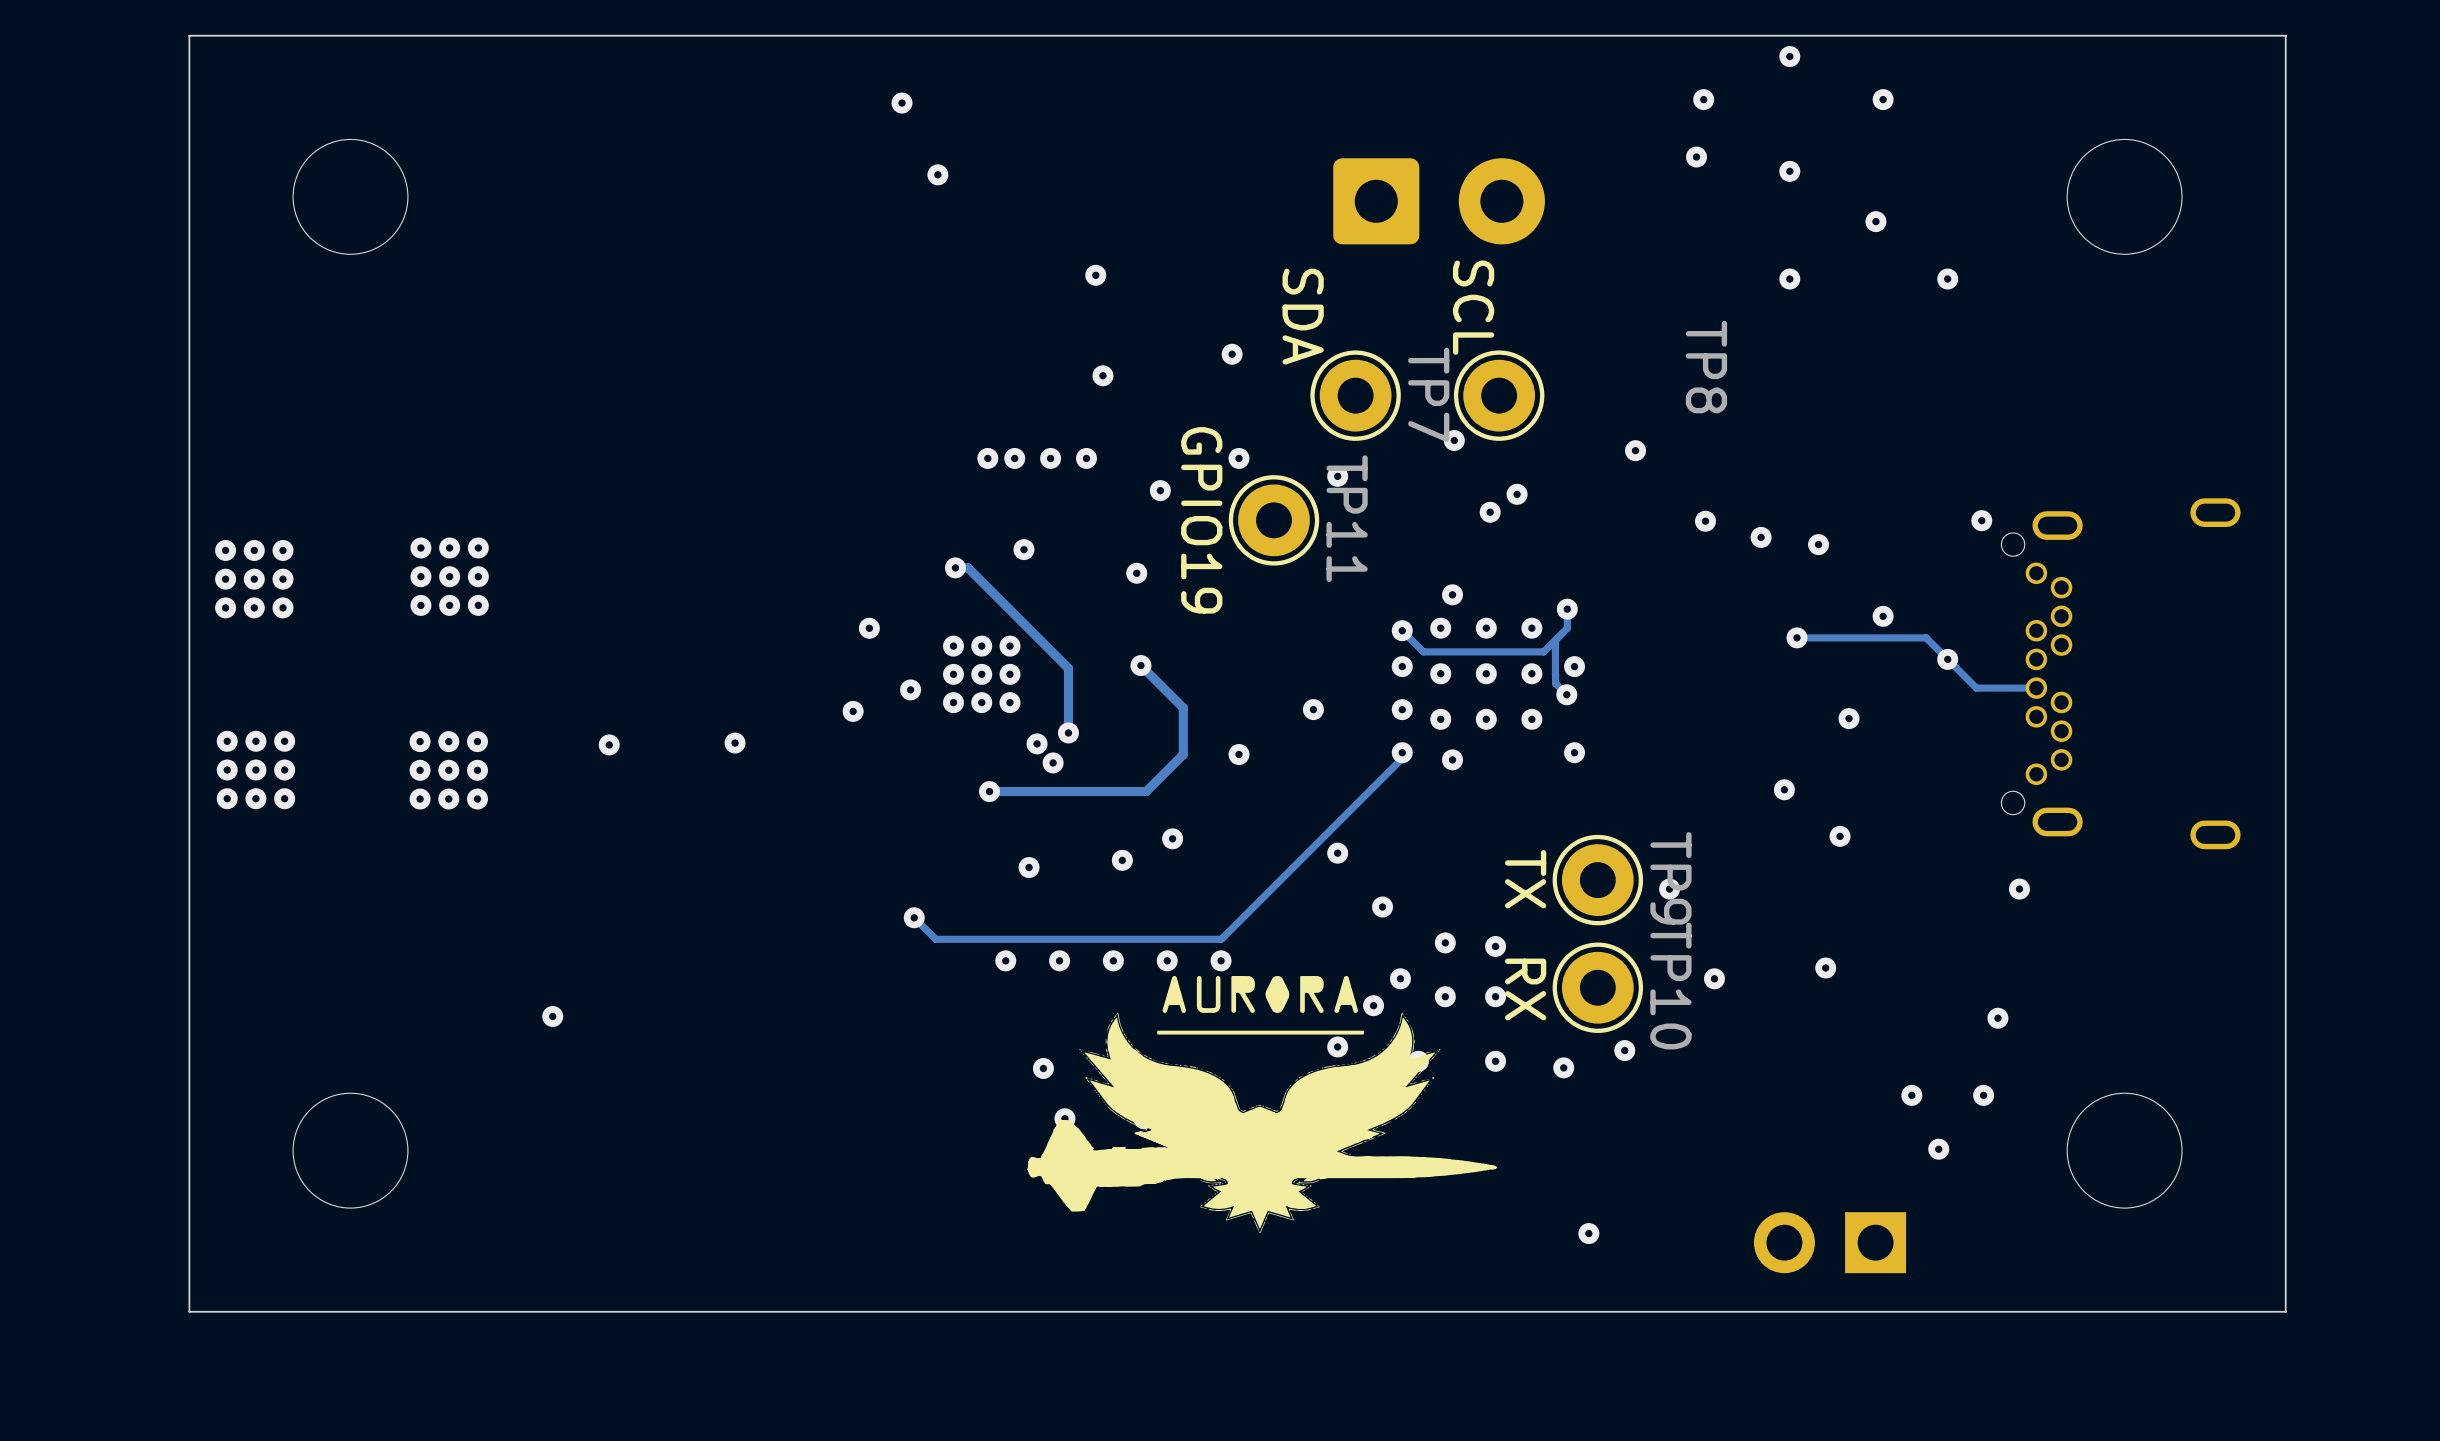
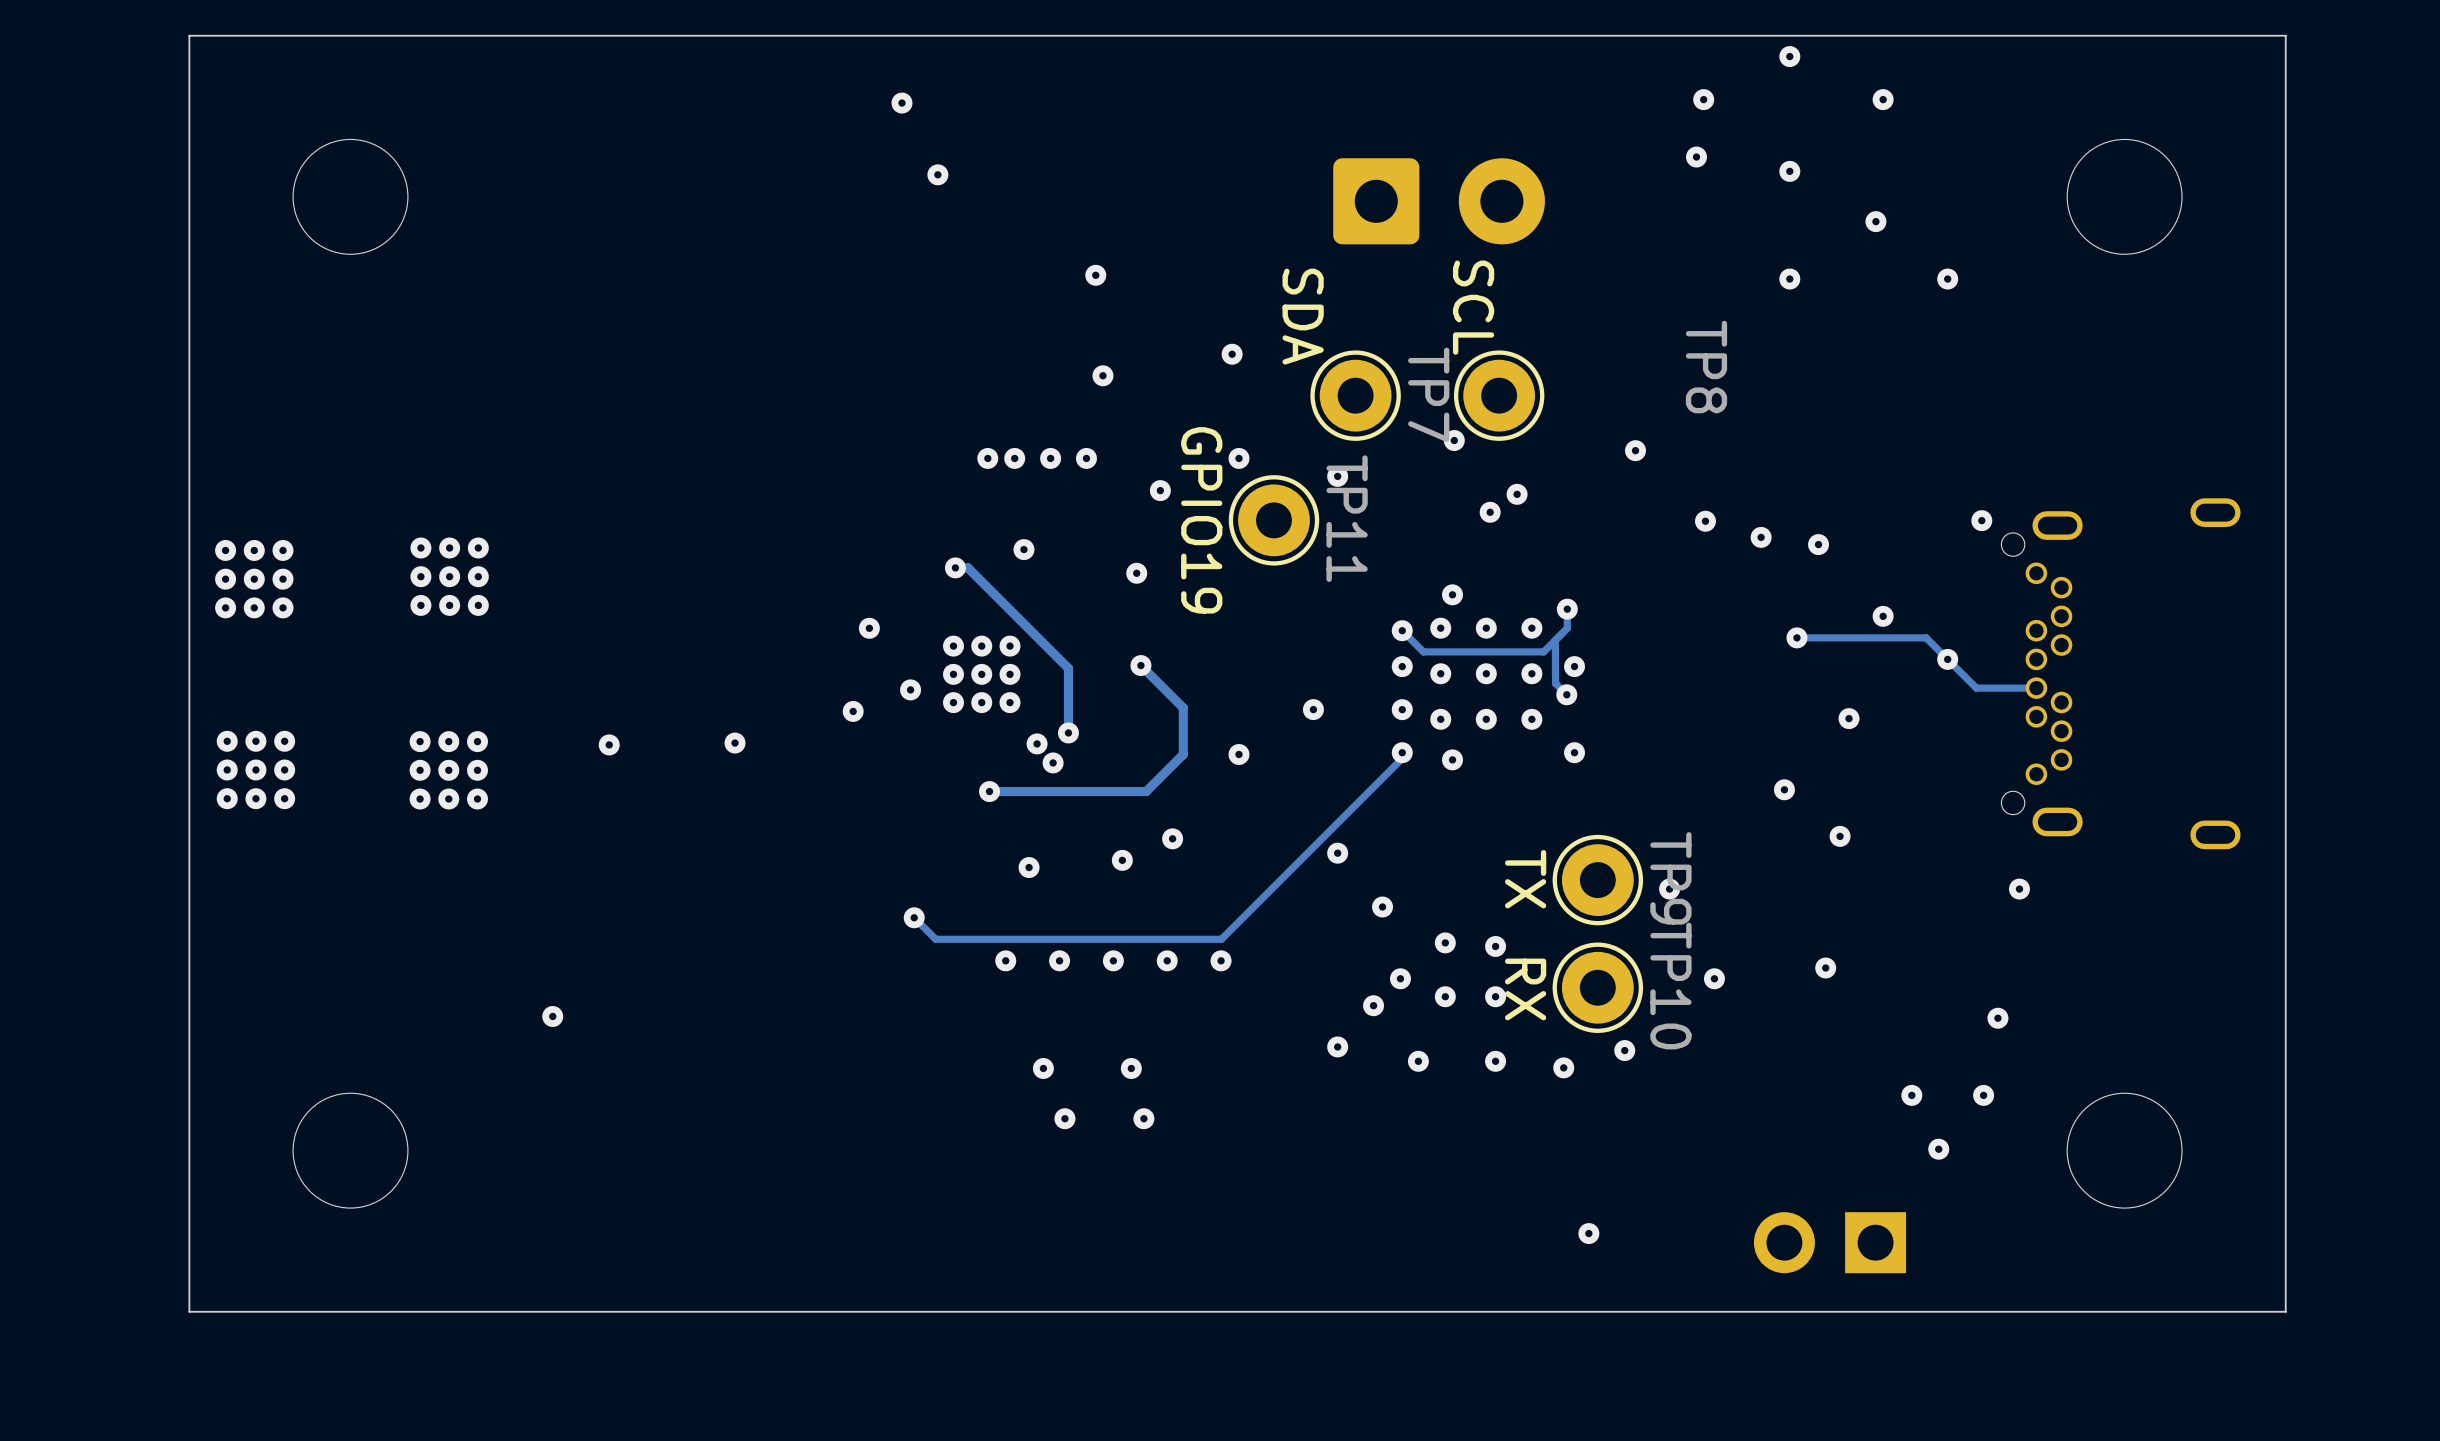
drawing: [1027, 975, 1497, 1234] -> none

